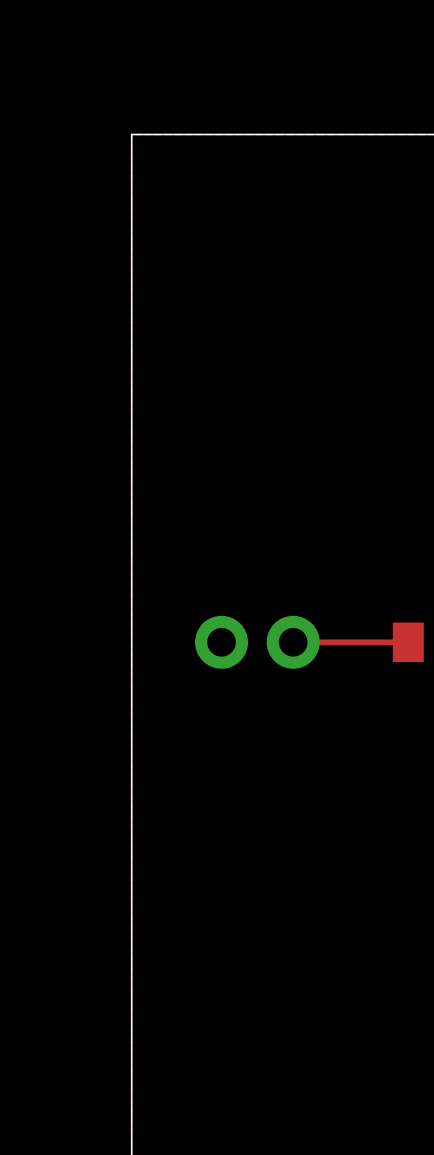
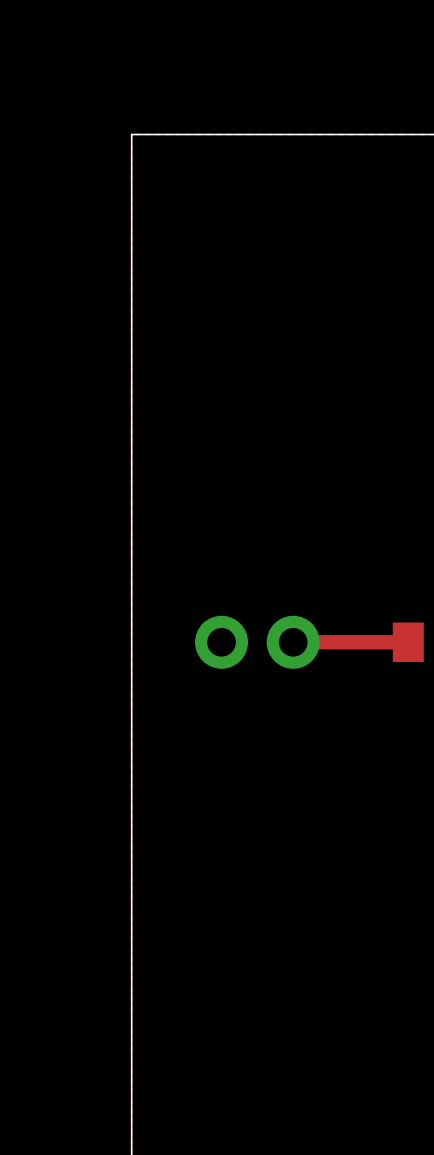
top track width: thin (408, 642) (293, 642) -> thick (408, 642) (293, 642)

